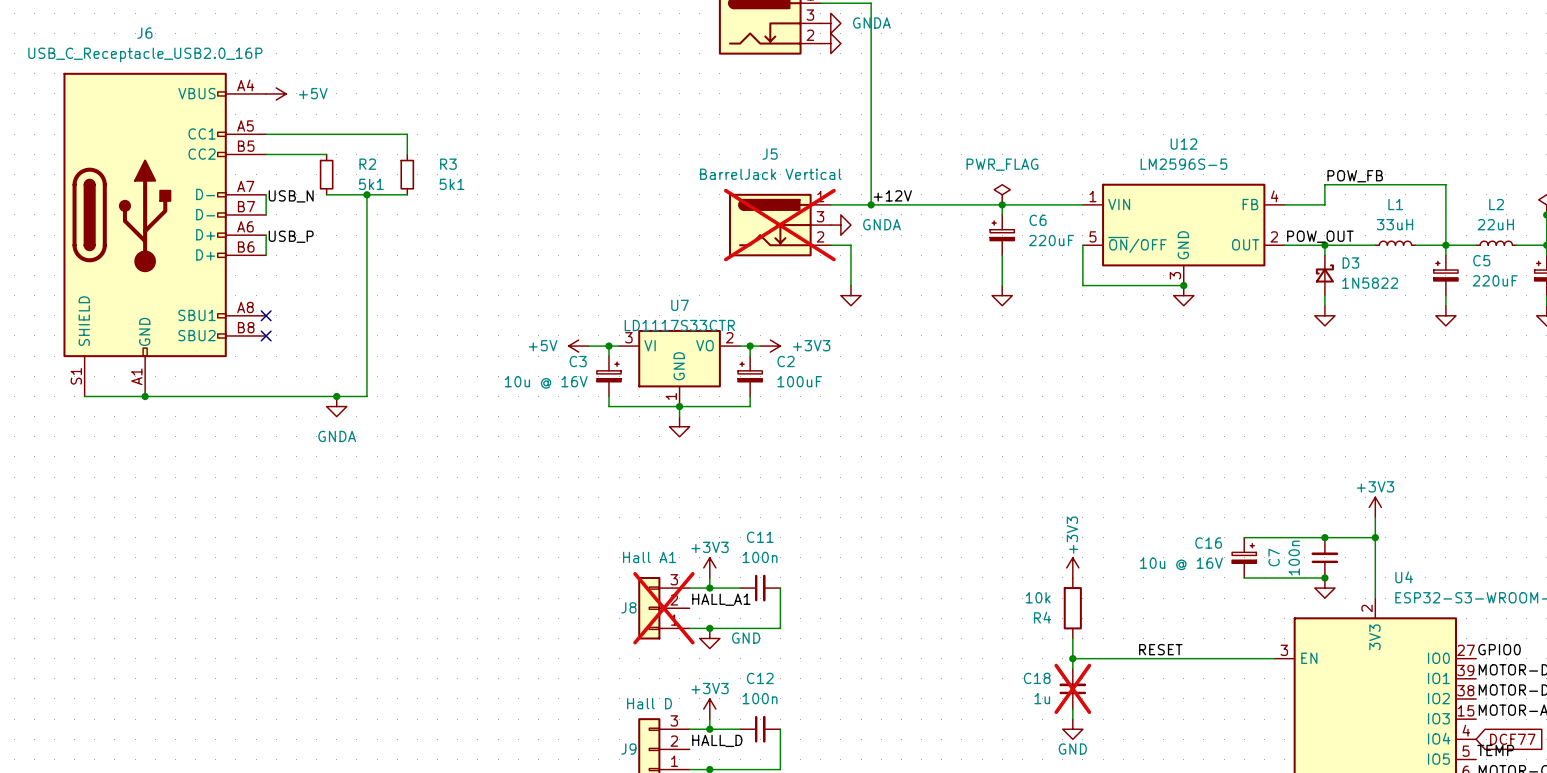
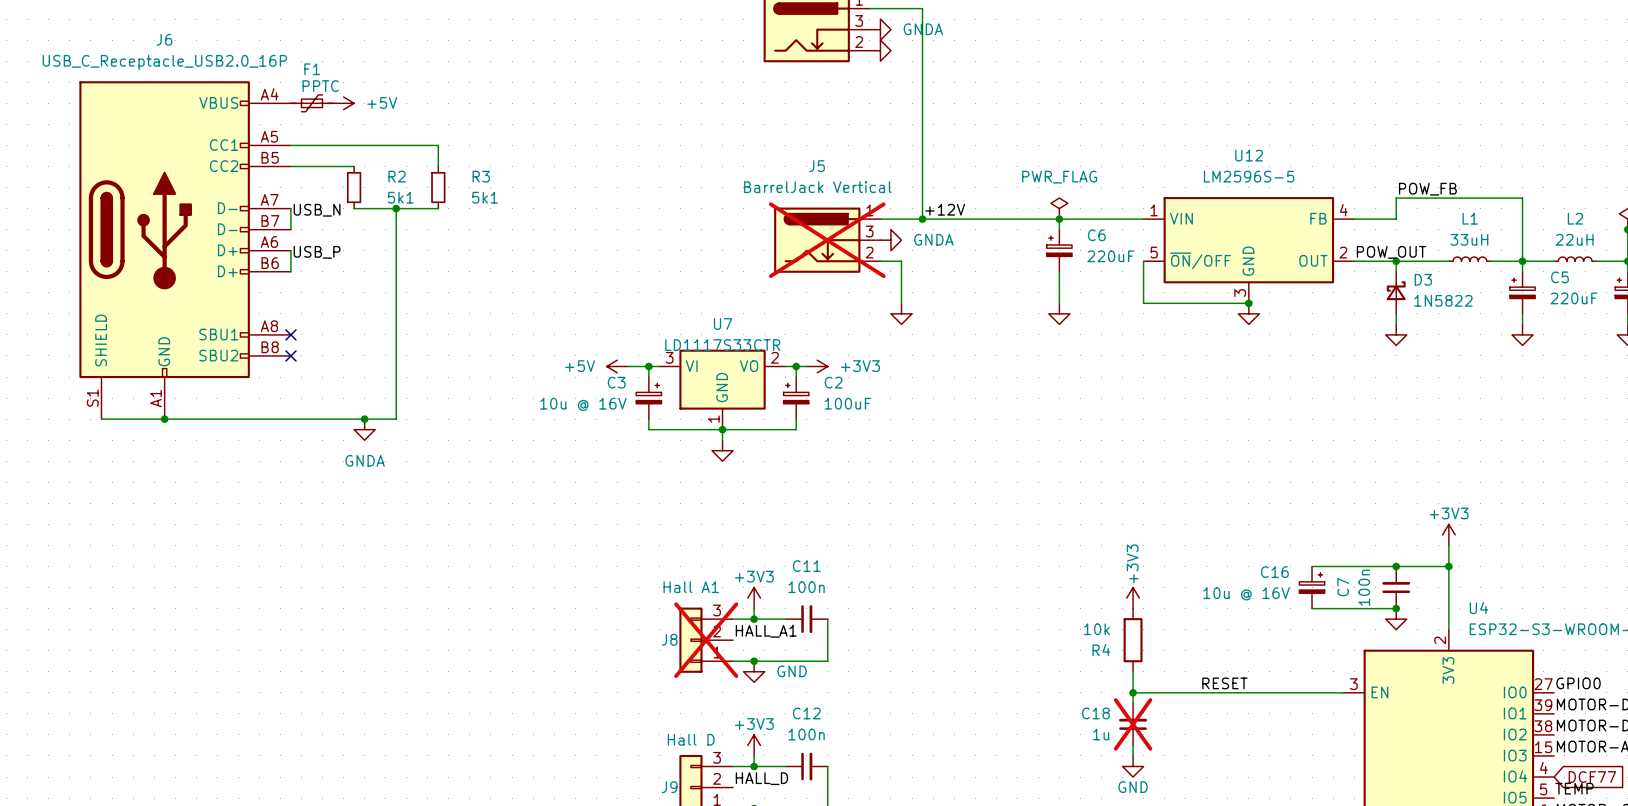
power symbol position: +5V (276, 93) -> +5V (343, 103)
F1: none -> PPTC (312, 103)

